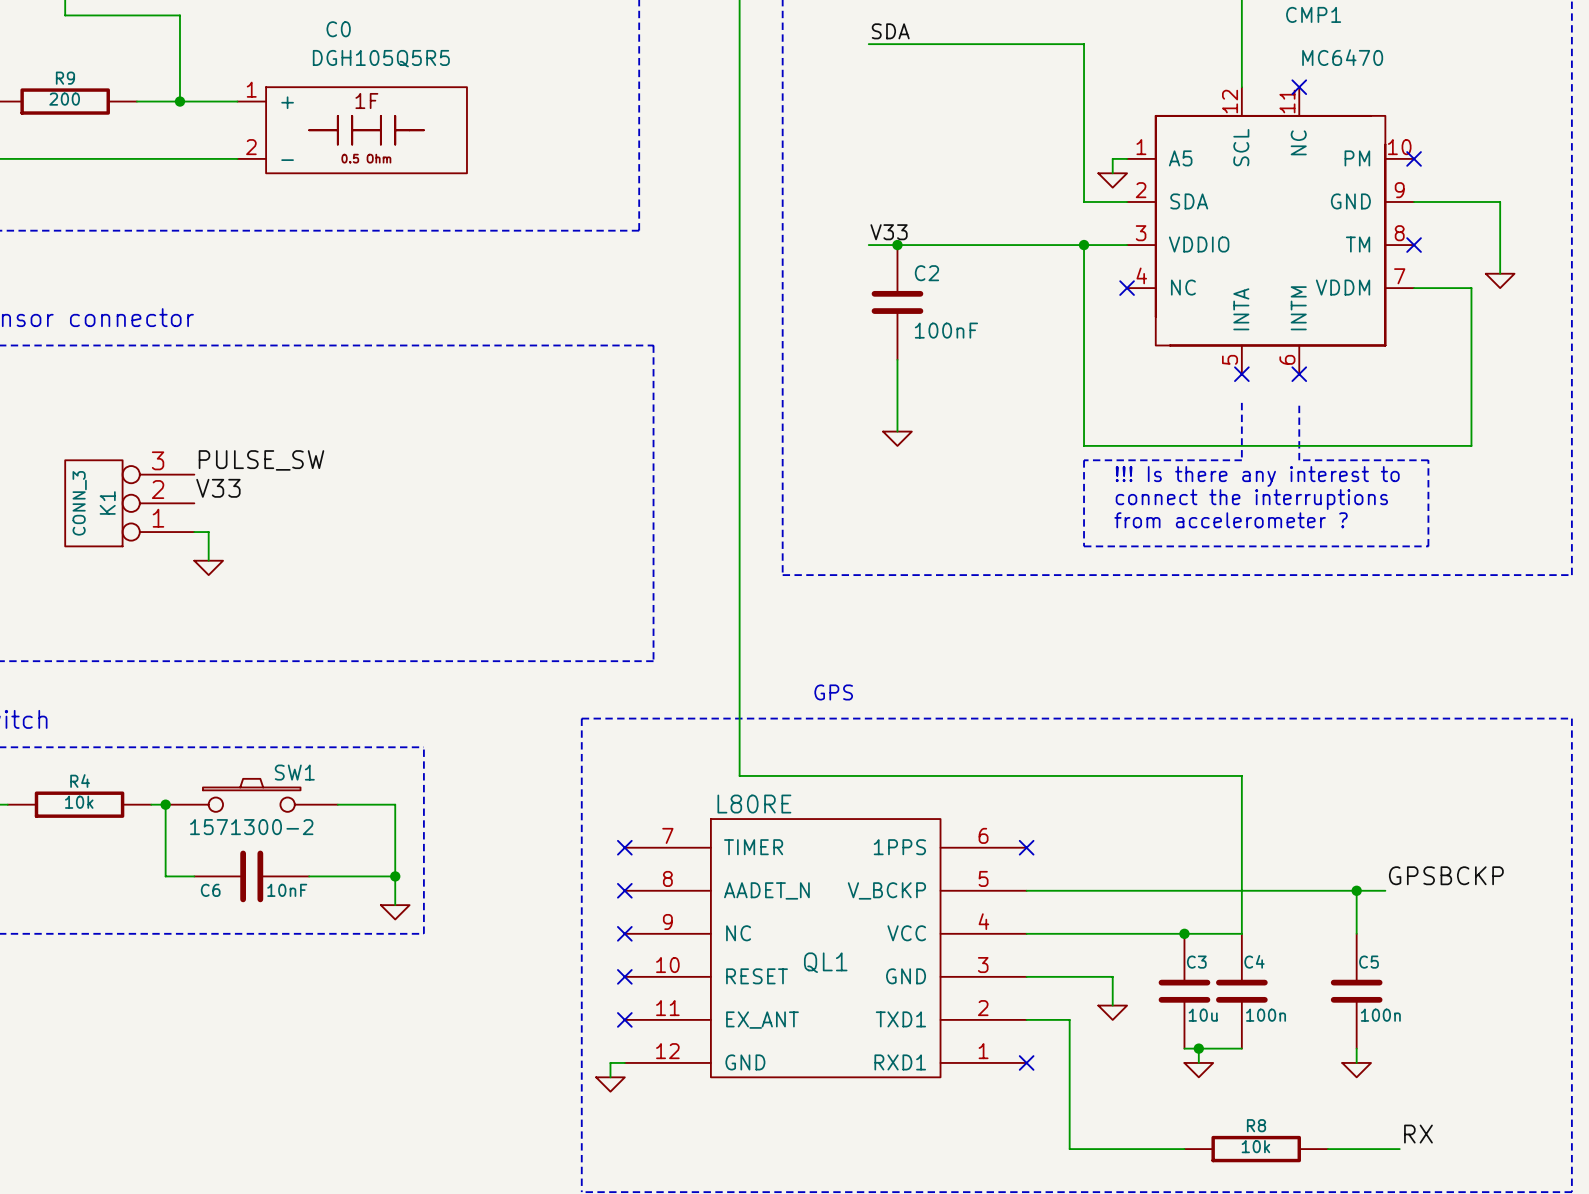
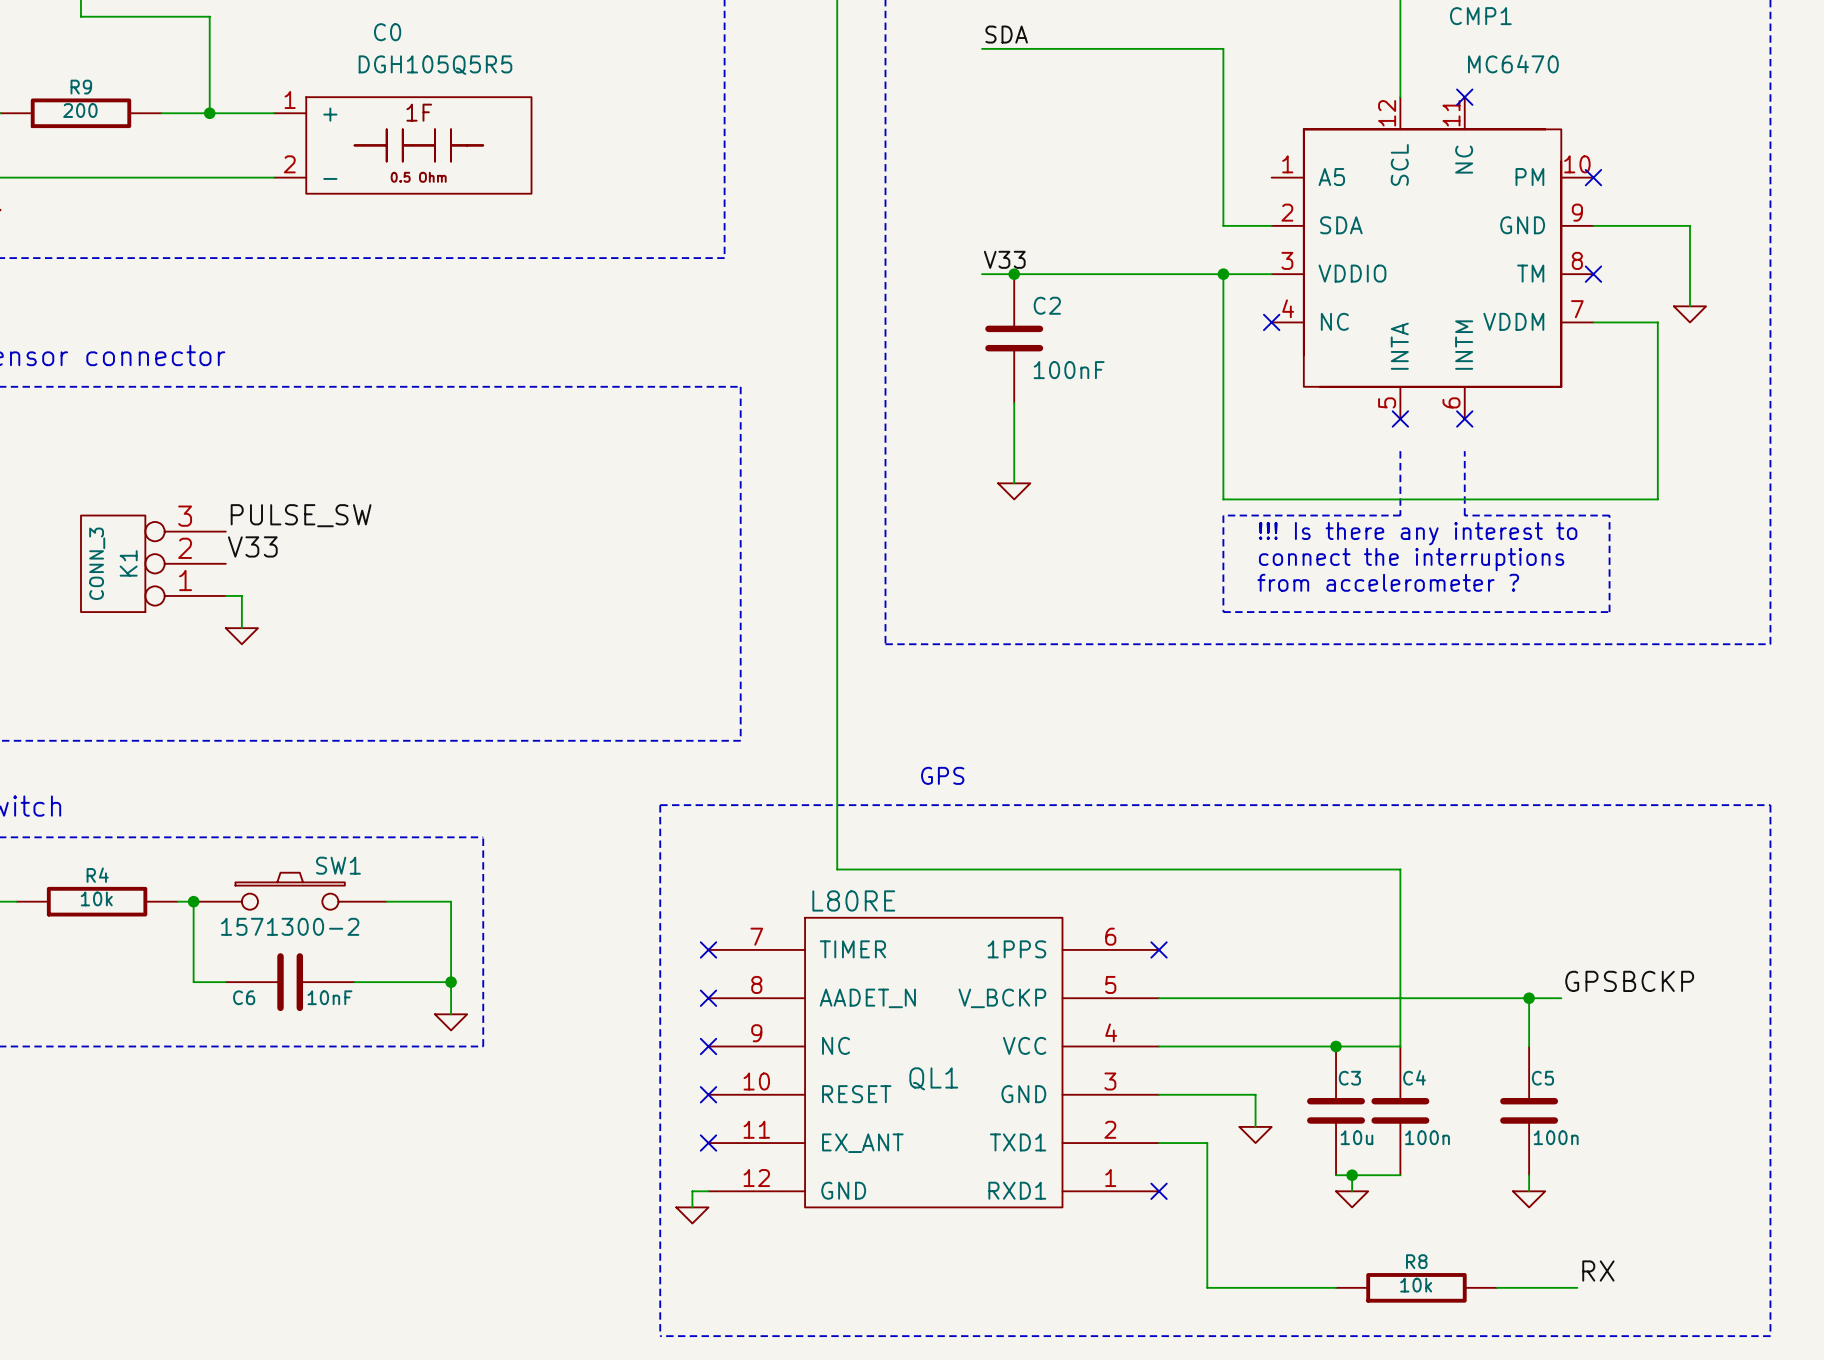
wire: (1127, 158) (1112, 158) (1112, 173) -> none
power symbol: (1112, 180) -> none

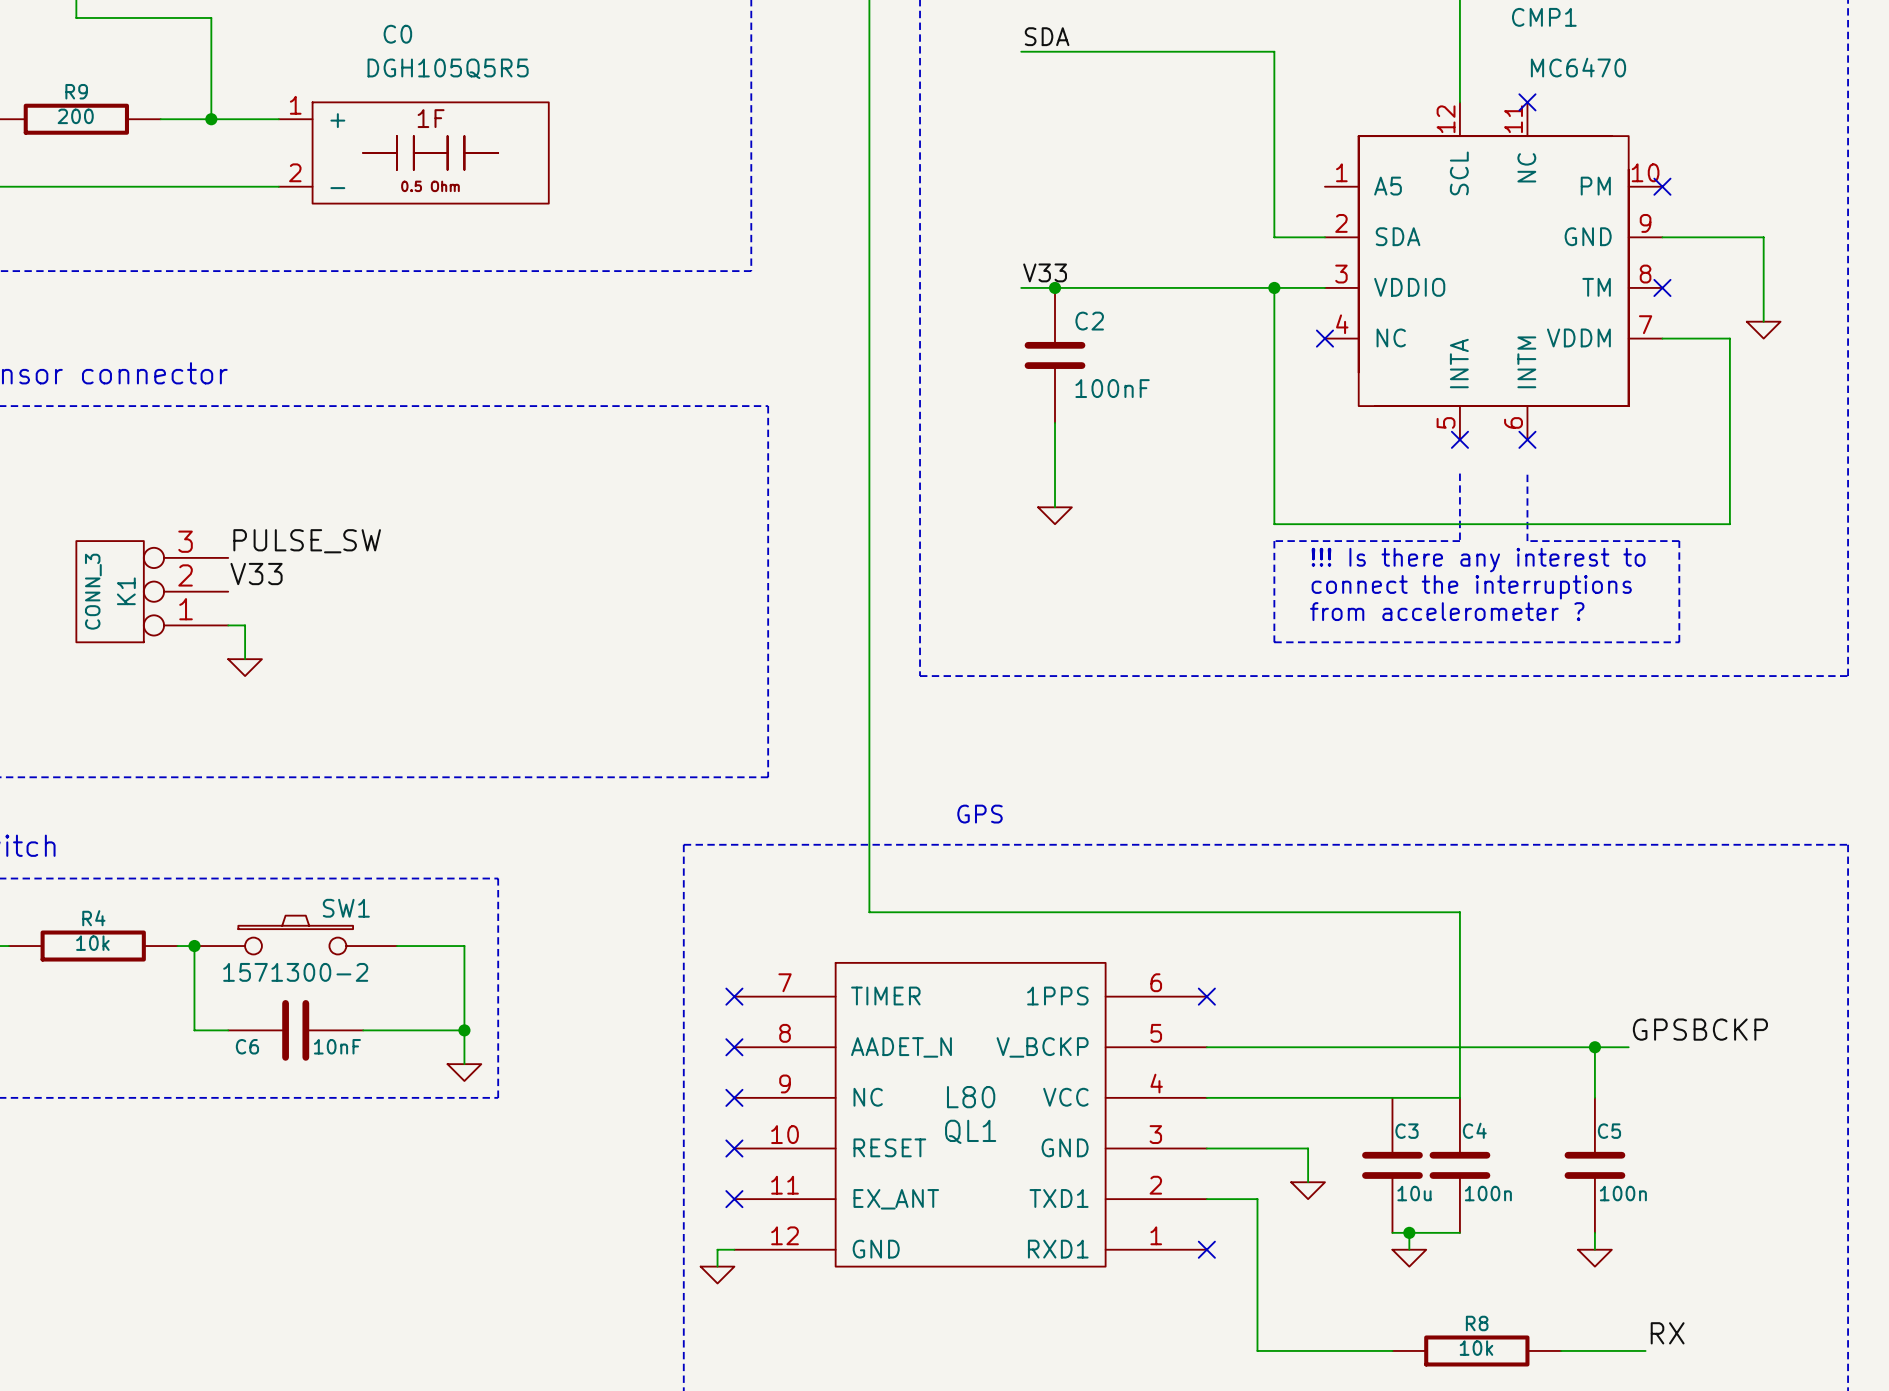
QL1 value: L80RE (853, 900) -> L80 (971, 1097)
junction: (1336, 1046) -> none

